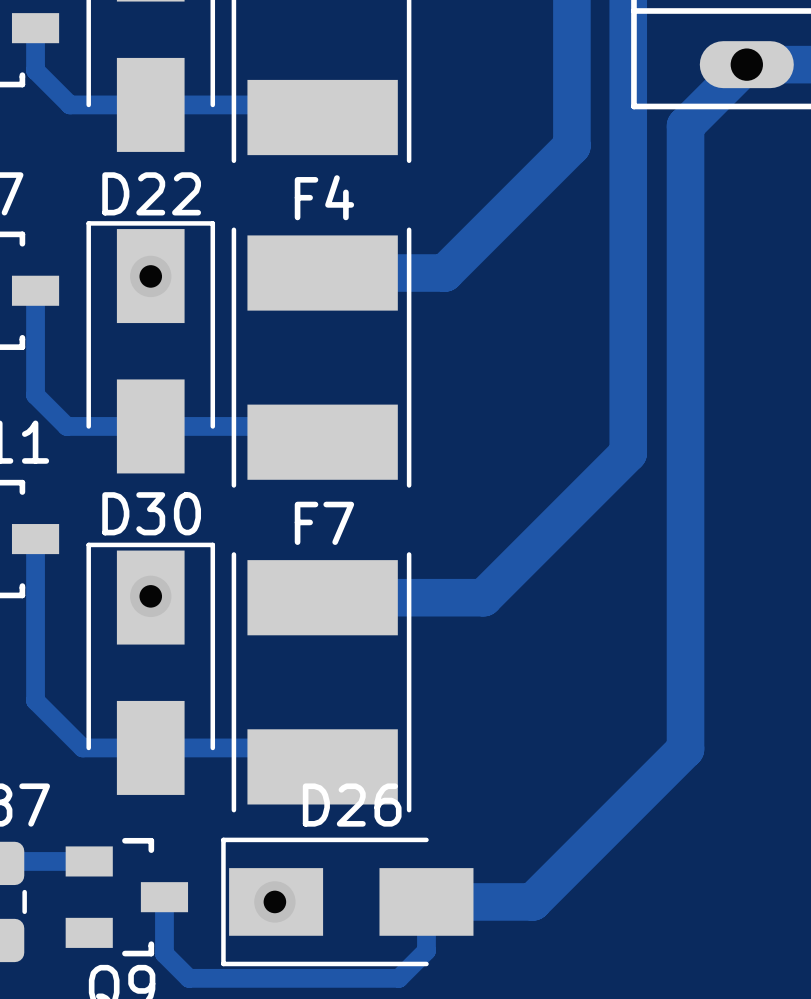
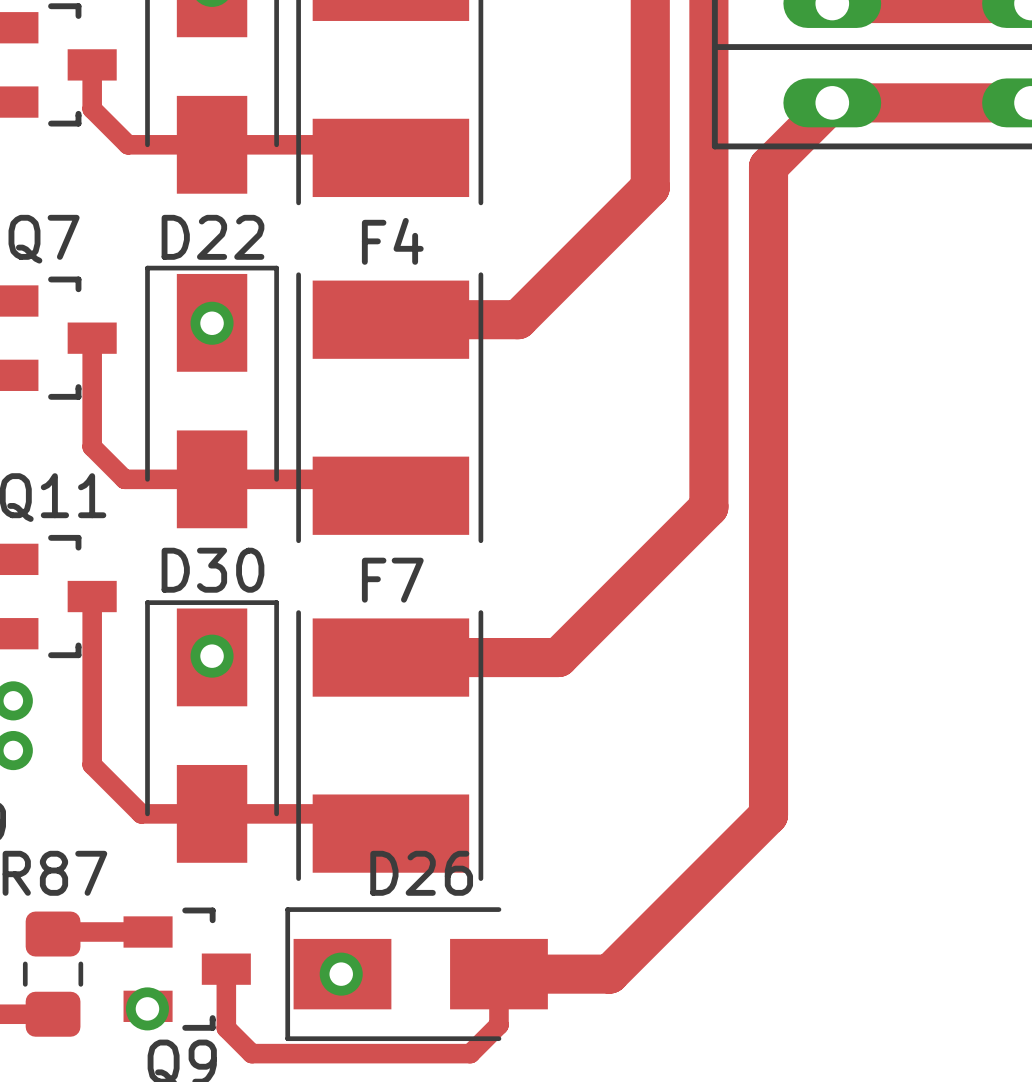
via: none -> (147, 1008)

